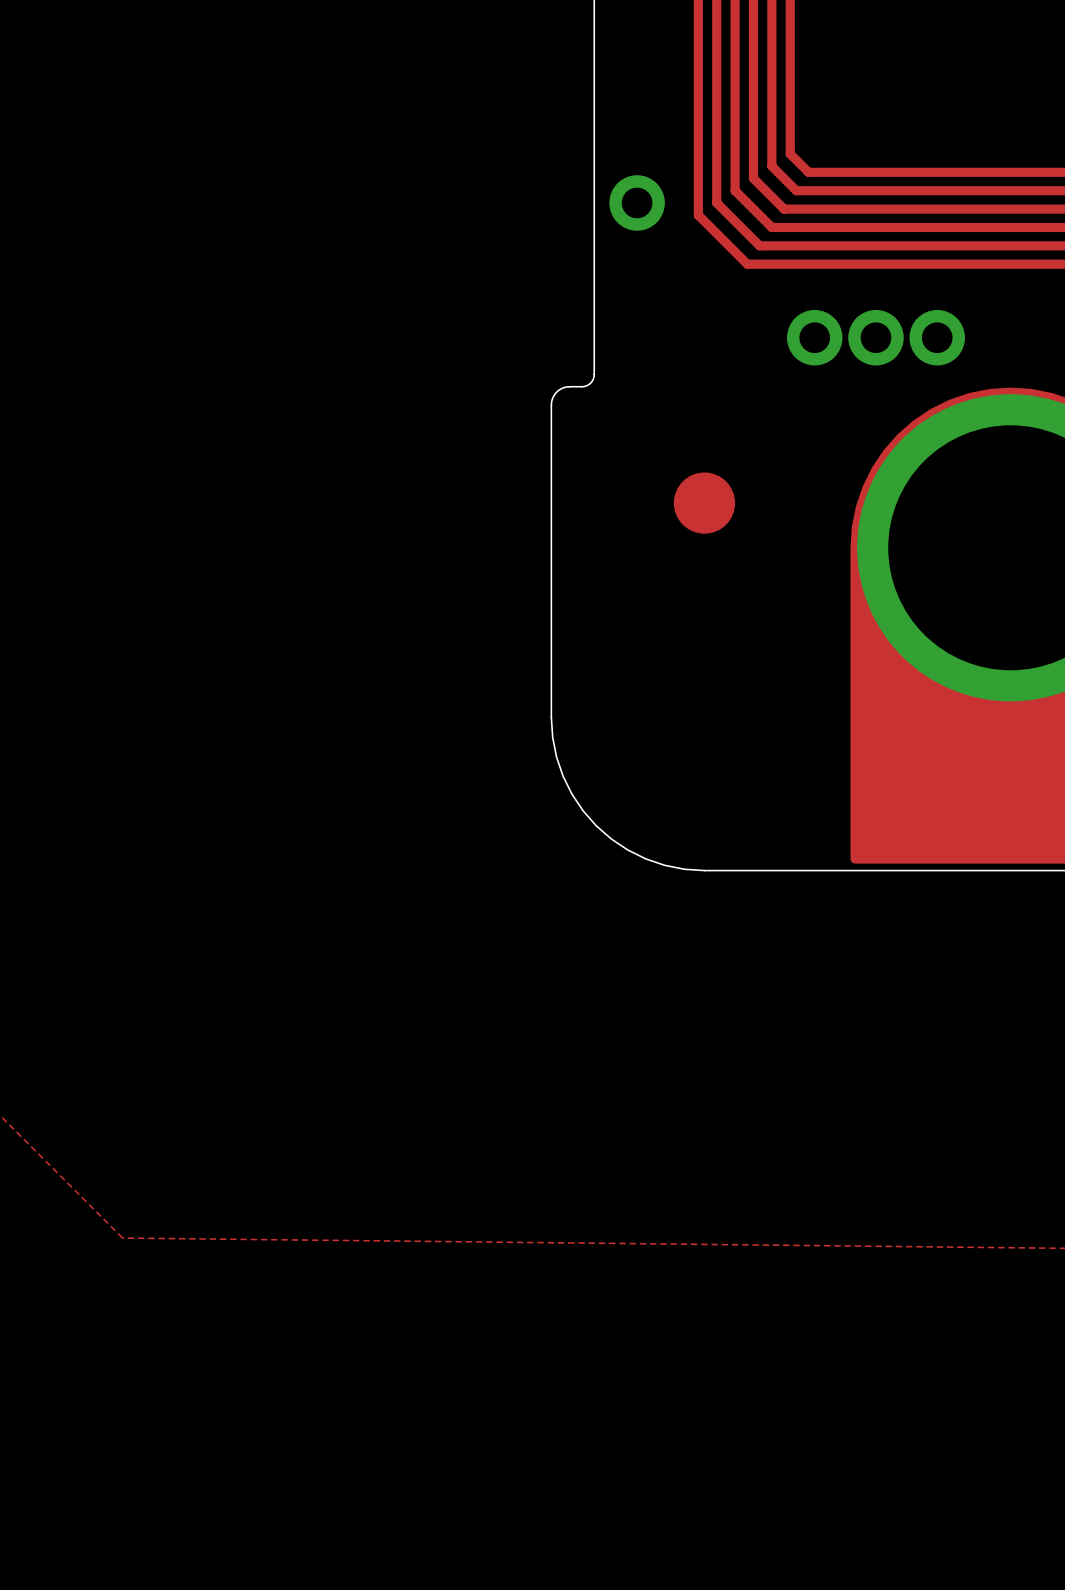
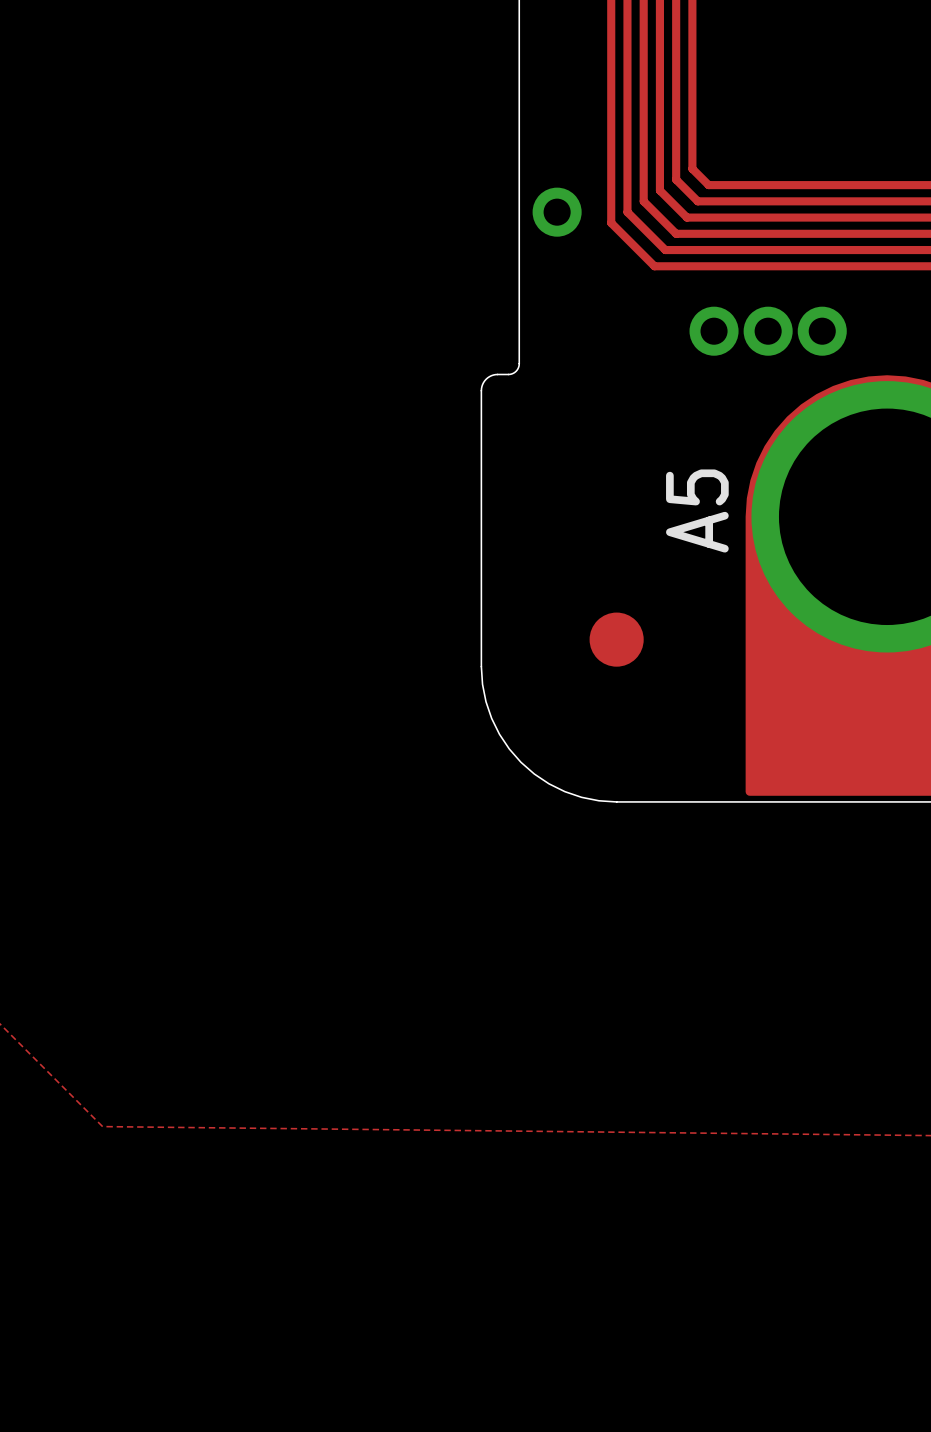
part position: (704, 503) -> (616, 639)
text: none -> A5 (697, 510)

